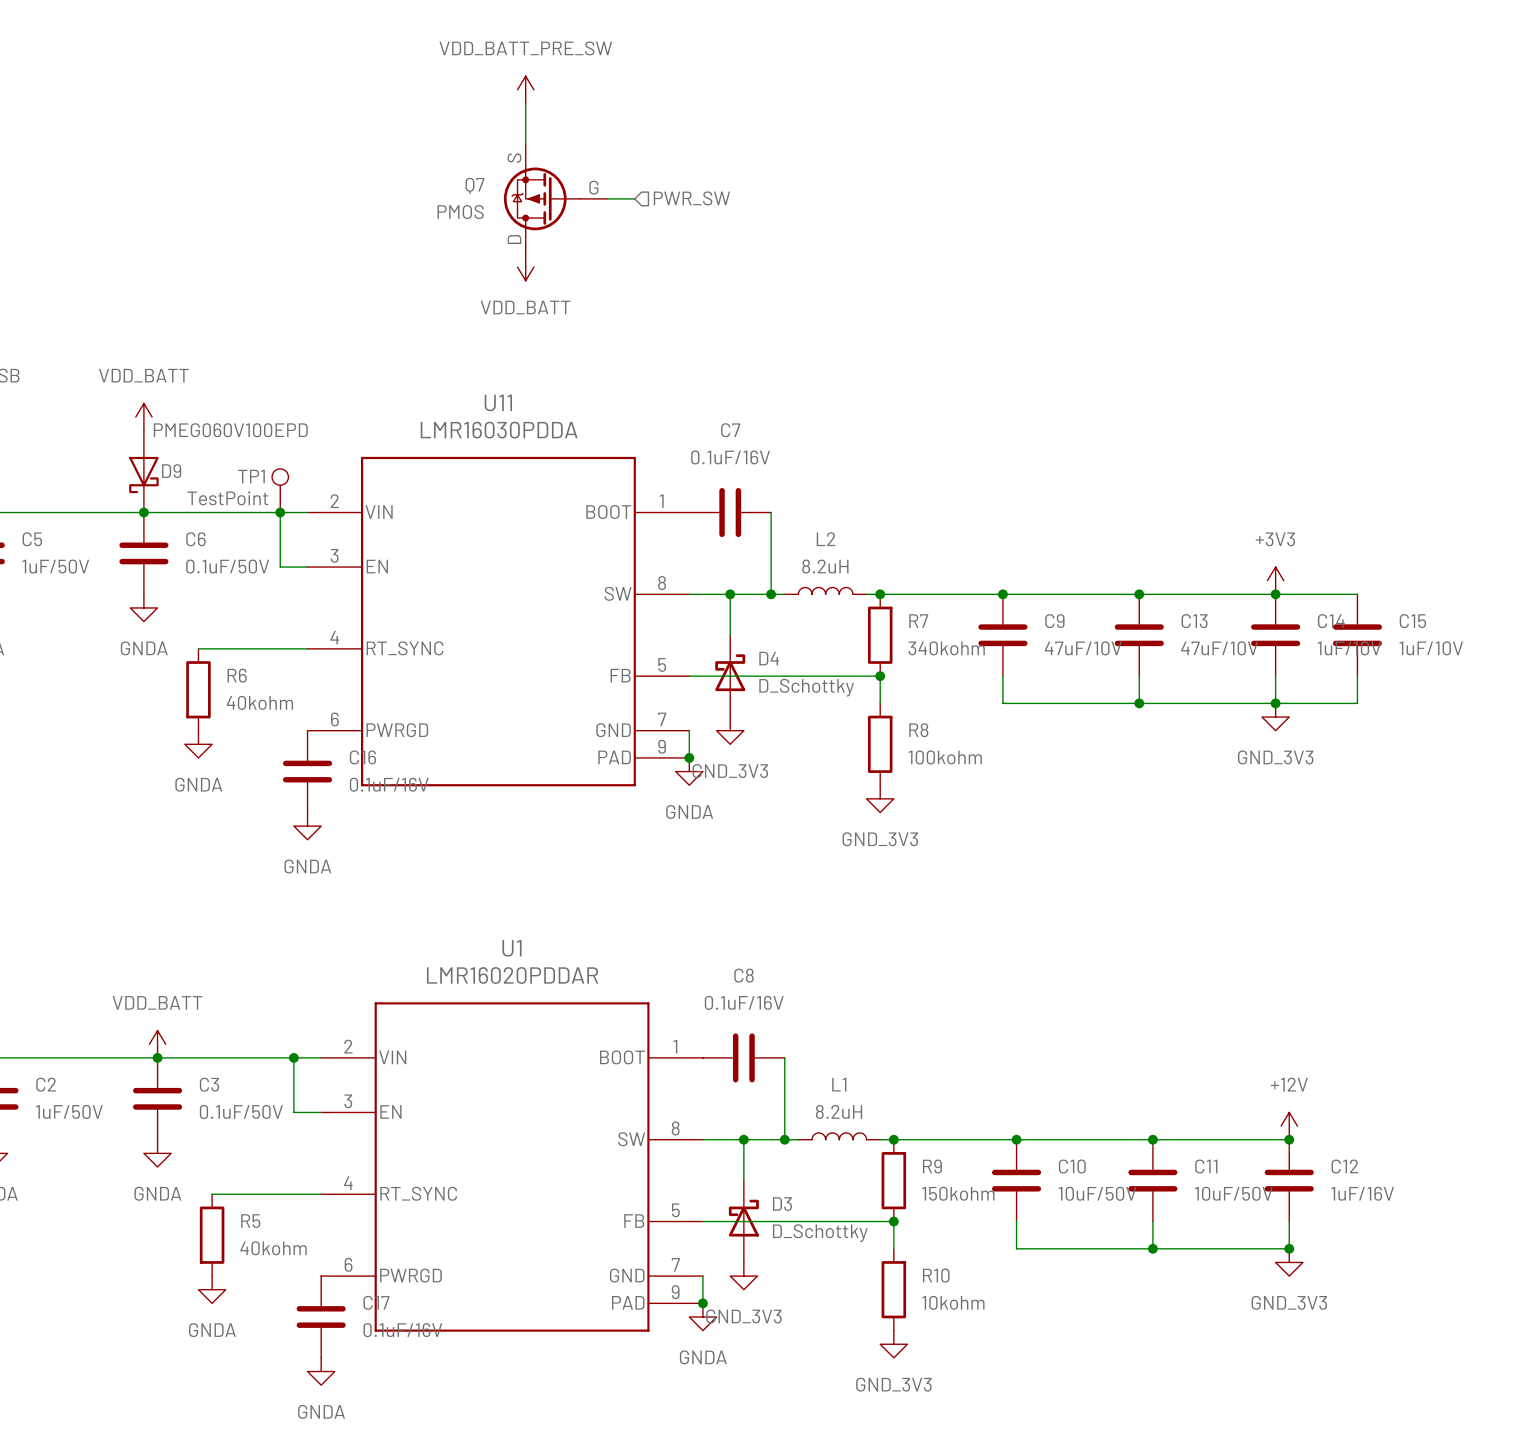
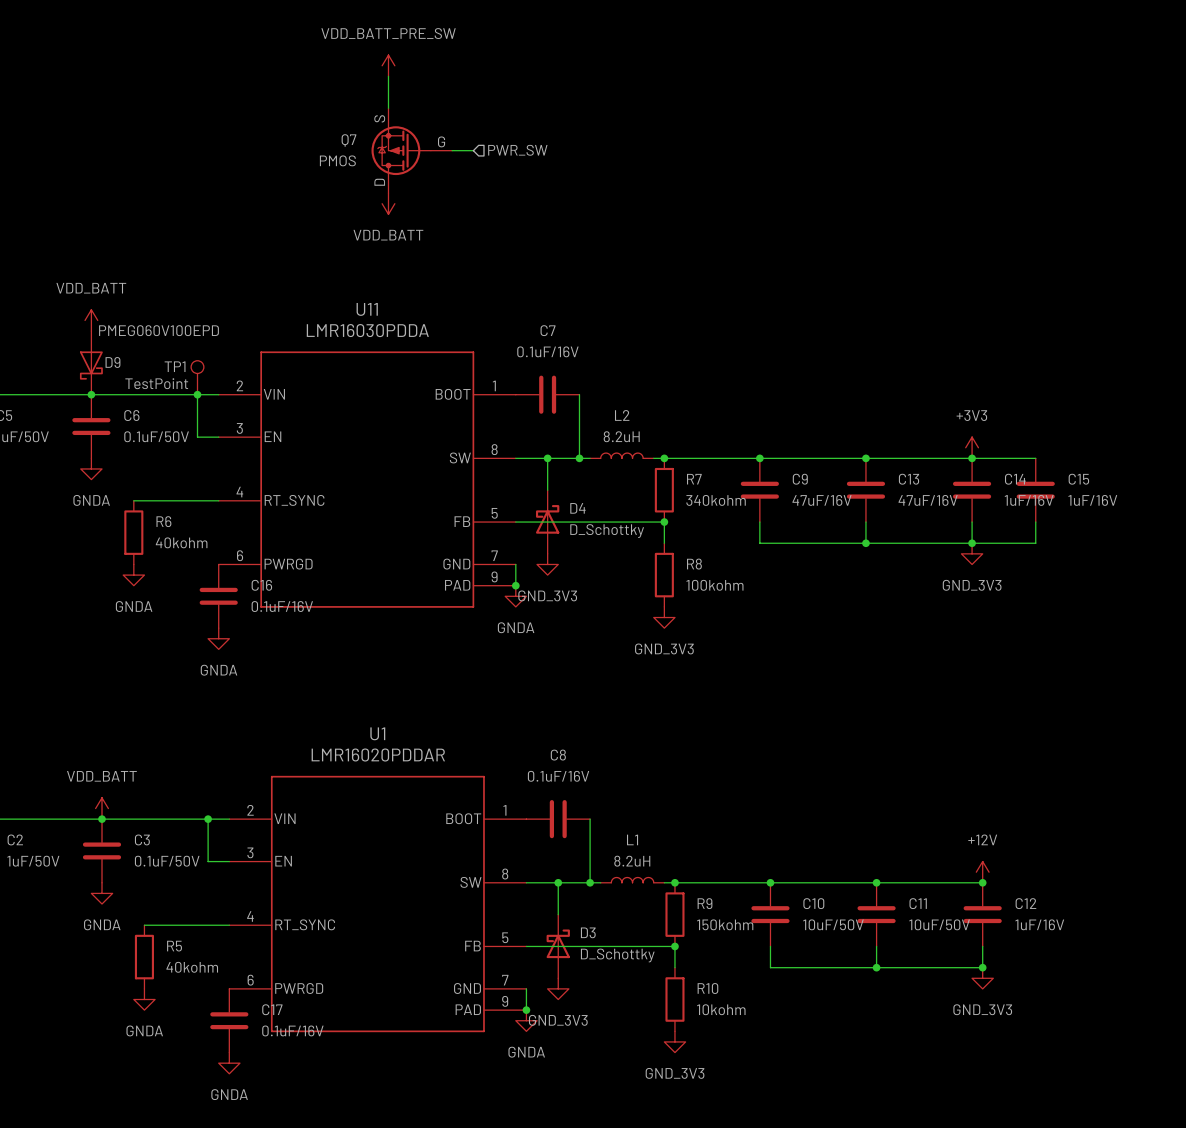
C9 value: 47uF/10V (1083, 648) -> 47uF/16V (821, 500)
C13 value: 47uF/10V (1219, 648) -> 47uF/16V (928, 500)
C14 value: 1uF/10V (1349, 648) -> 1uF/16V (1029, 500)
C15 value: 1uF/10V (1431, 648) -> 1uF/16V (1092, 500)

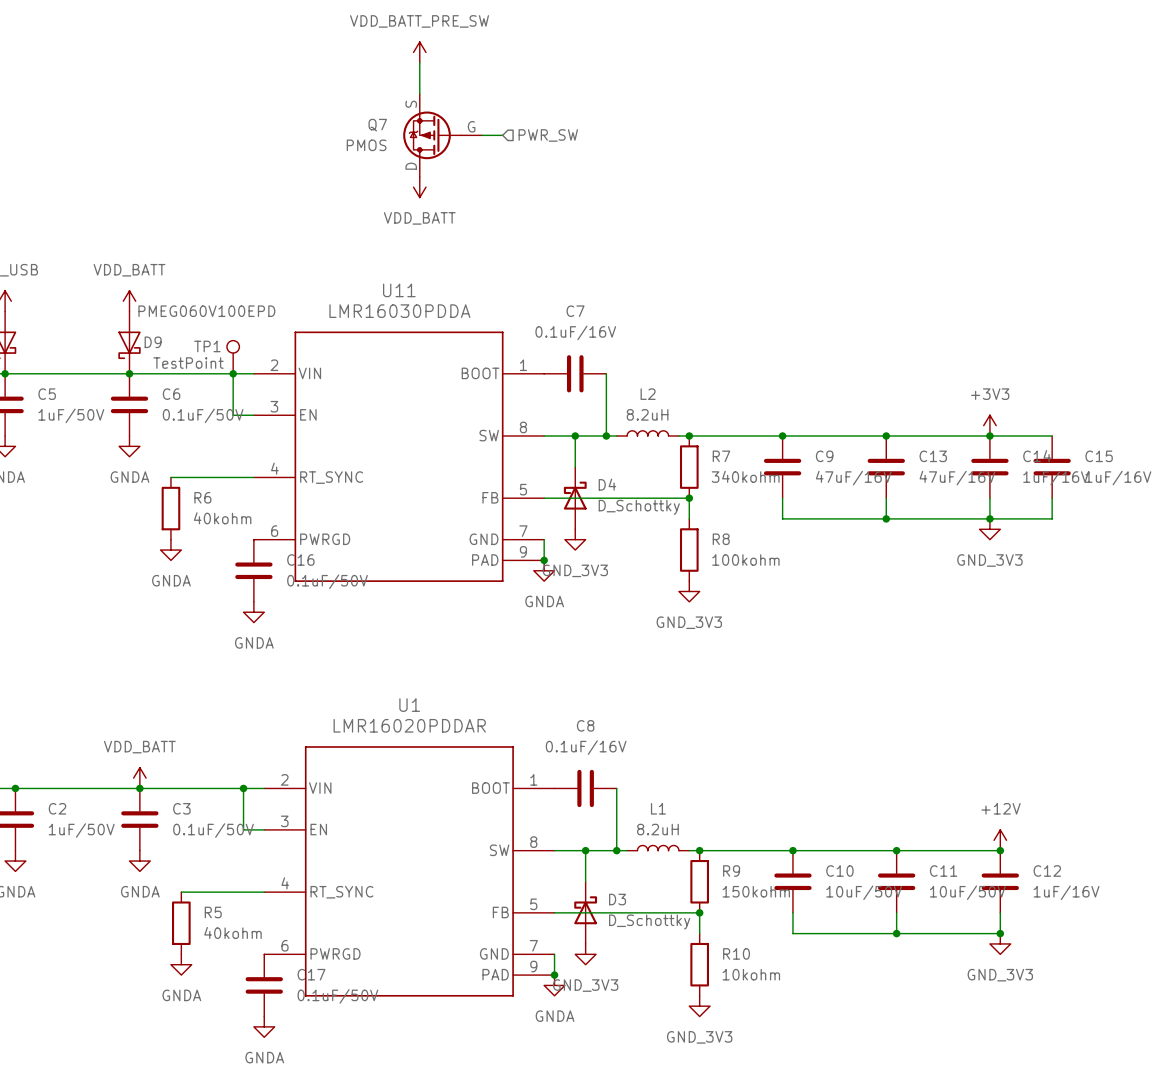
C16 value: 0.1uF/16V (282, 606) -> 0.1uF/50V (327, 581)
C17 value: 0.1uF/16V (292, 1030) -> 0.1uF/50V (337, 996)

